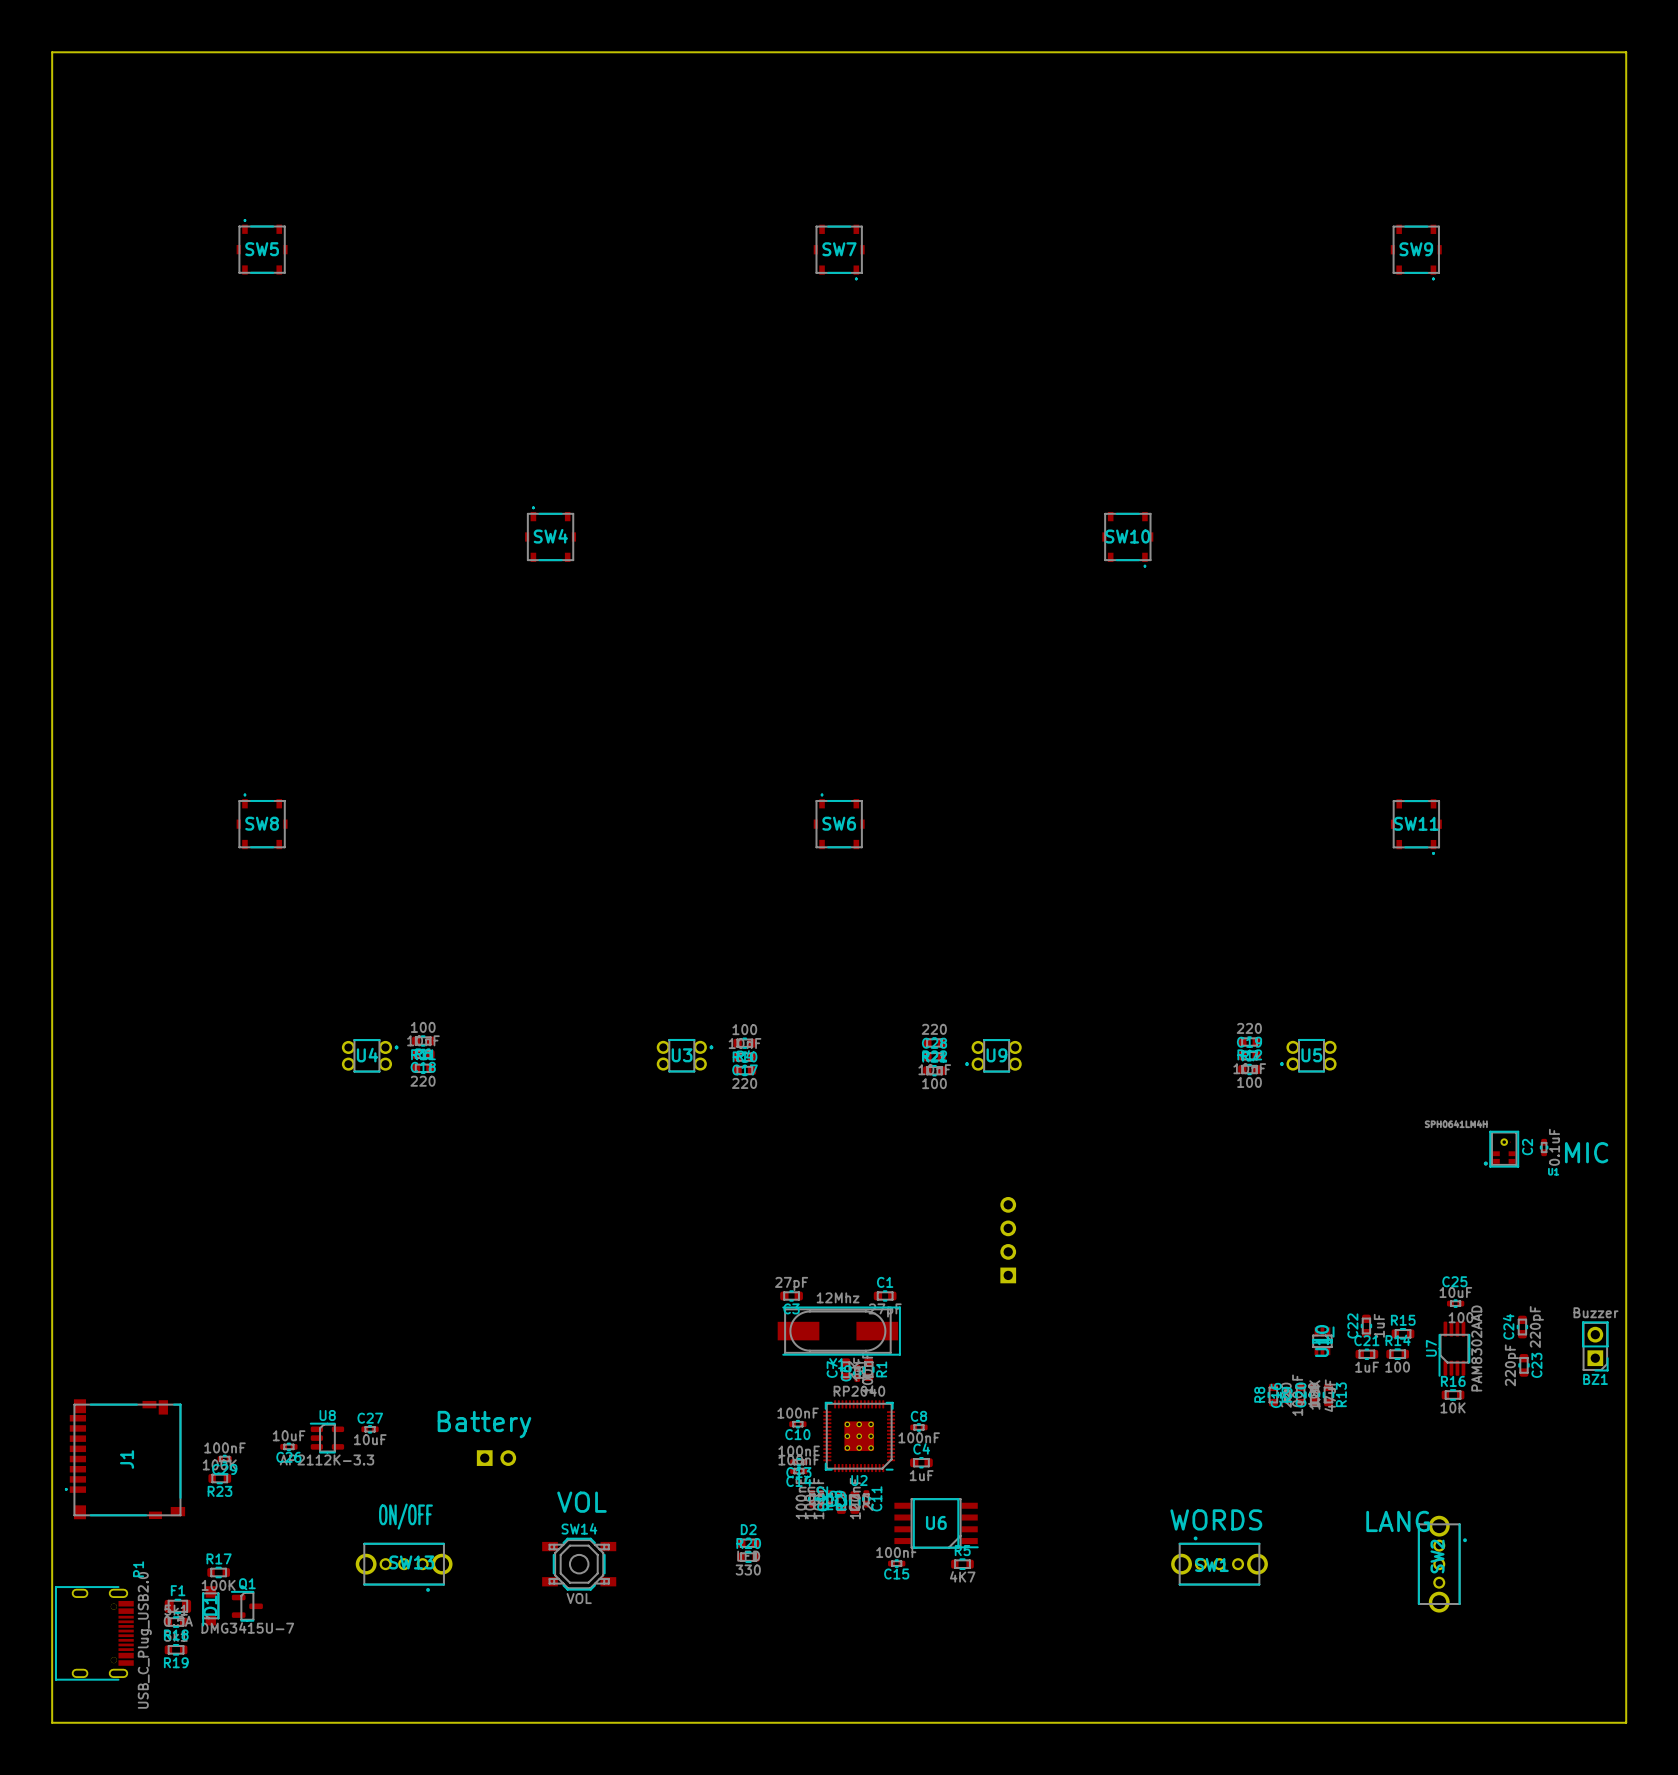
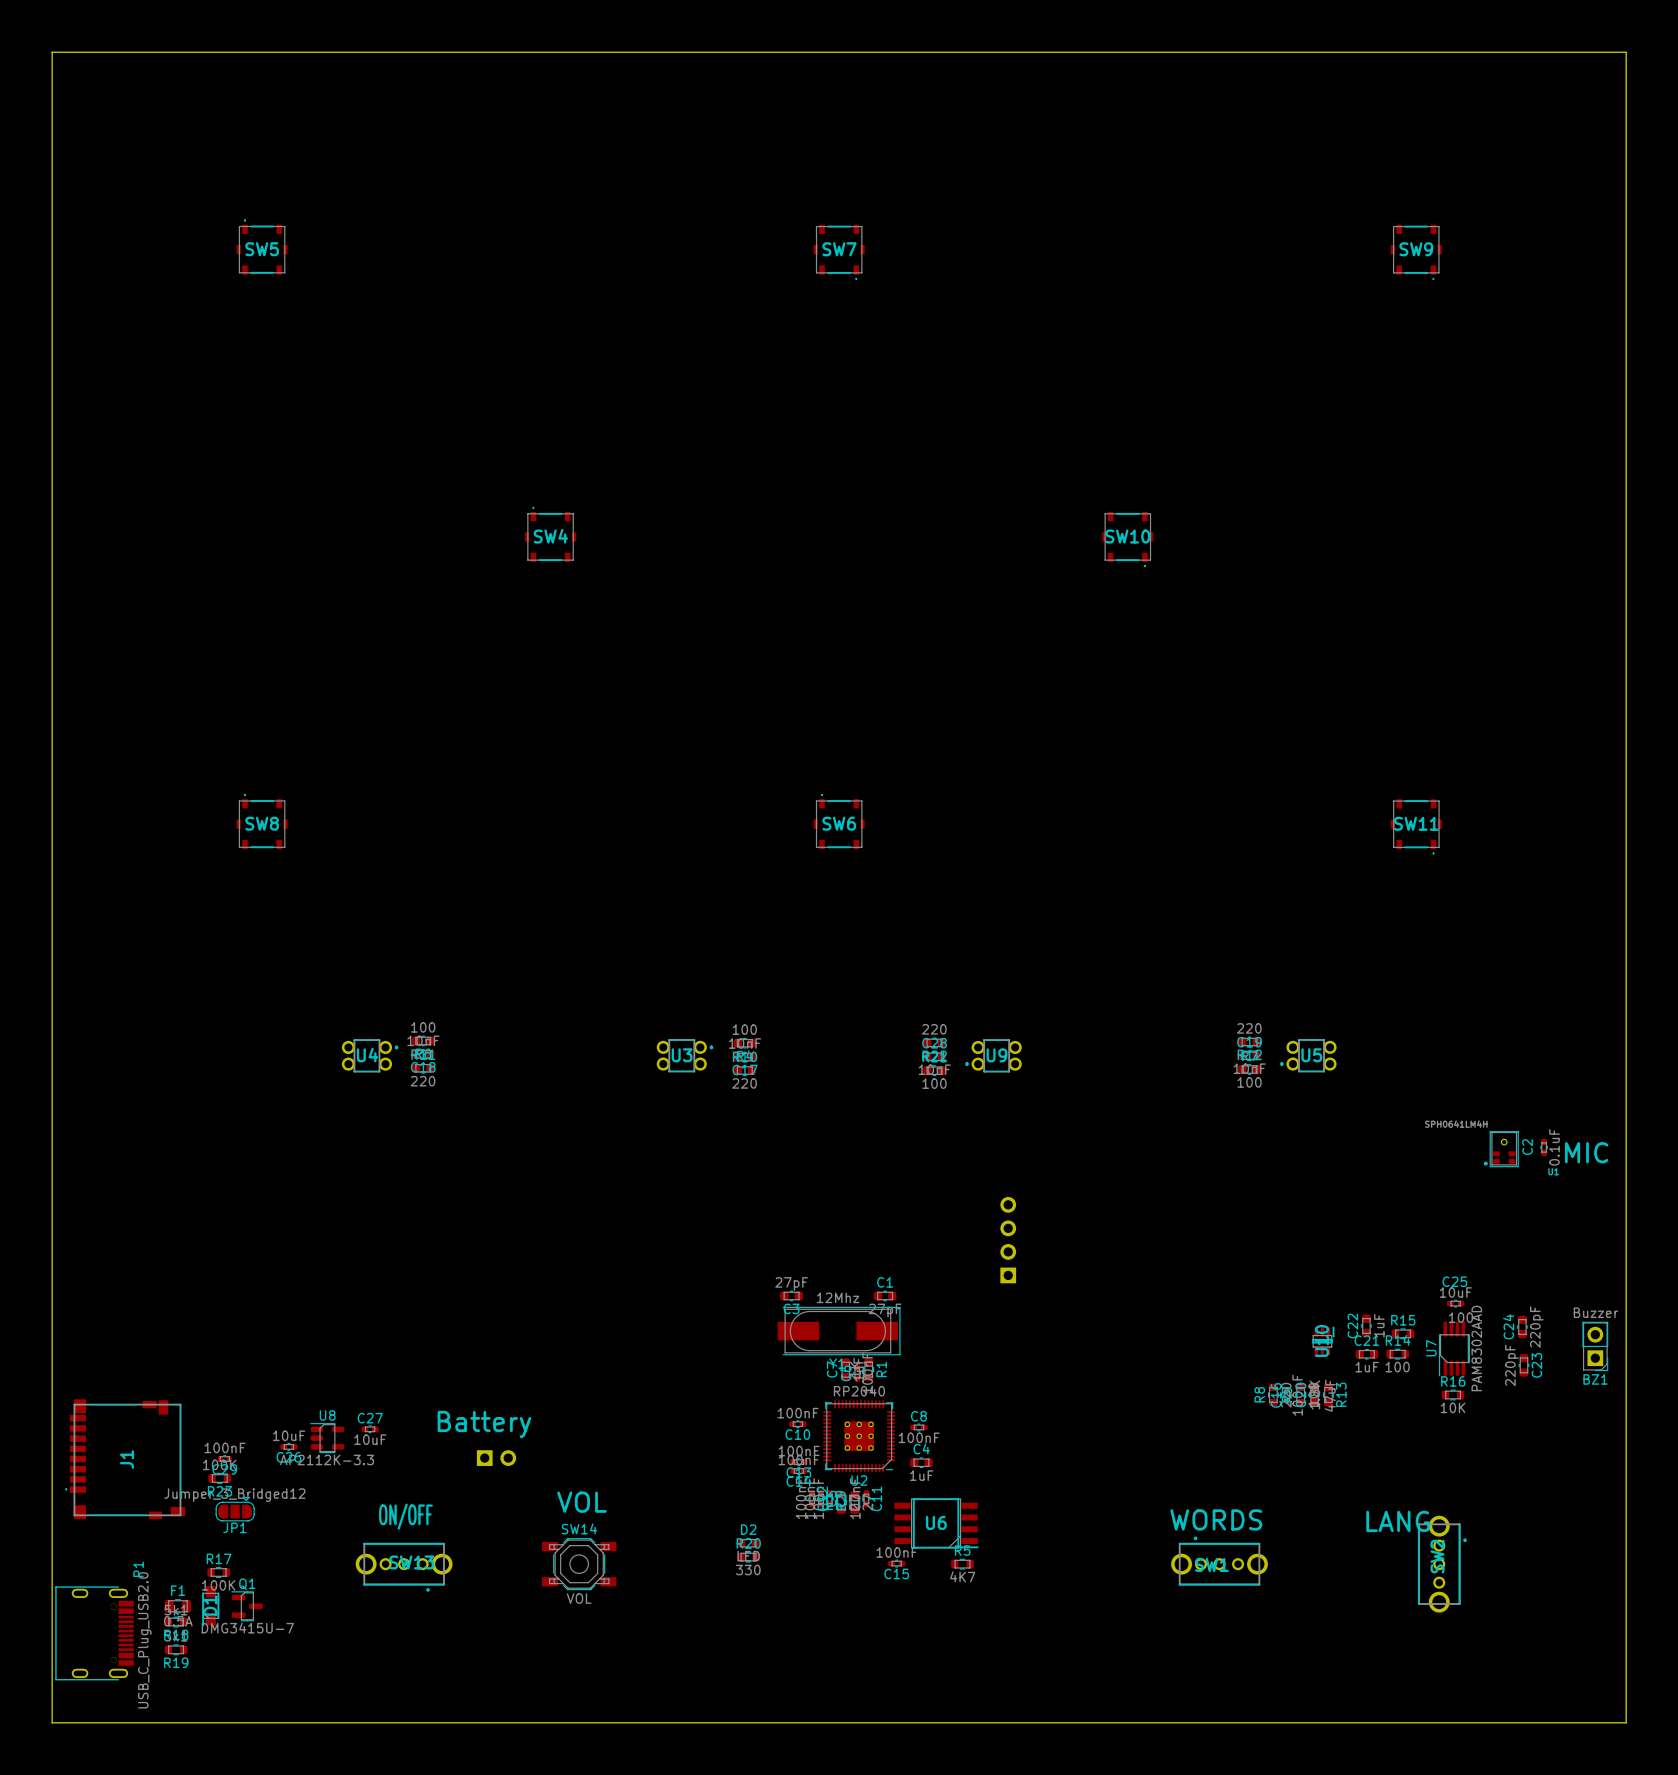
JP1: none -> Jumper_3_Bridged12 (235, 1509)

